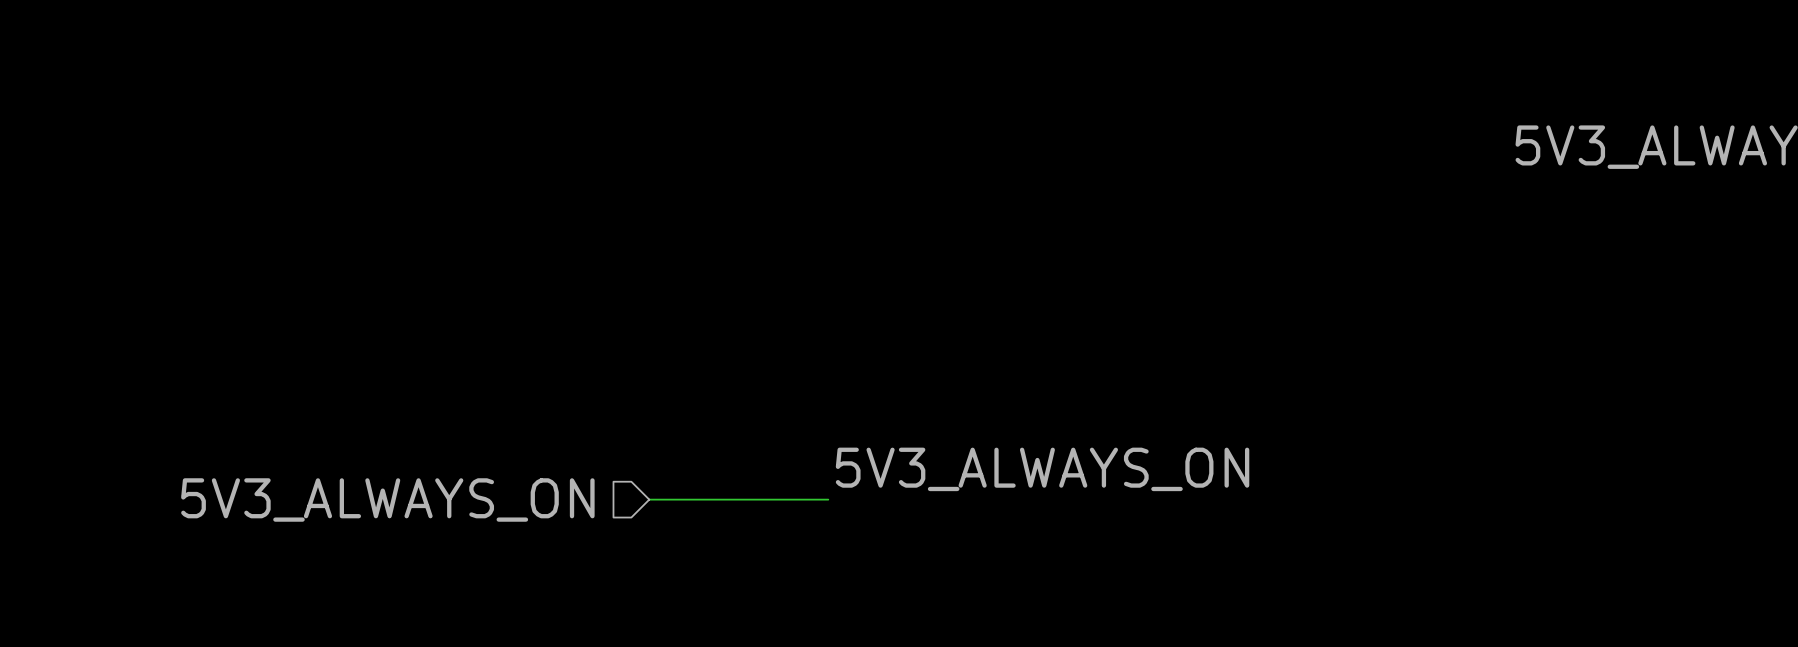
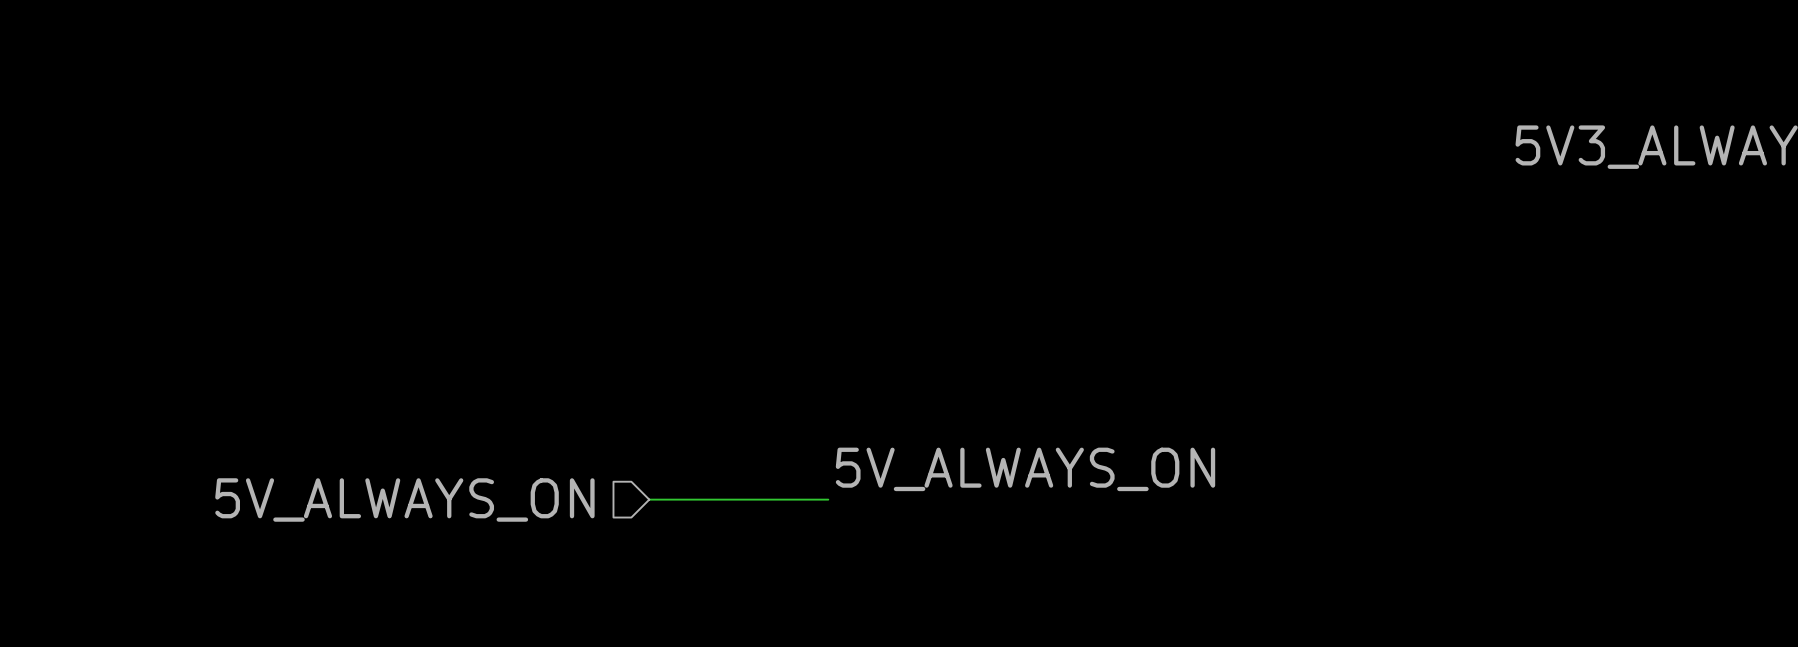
label: 5V3_ALWAYS_ON (1042, 469) -> 5V_ALWAYS_ON (1025, 469)
hierarchical label: 5V3_ALWAYS_ON (387, 499) -> 5V_ALWAYS_ON (404, 499)

